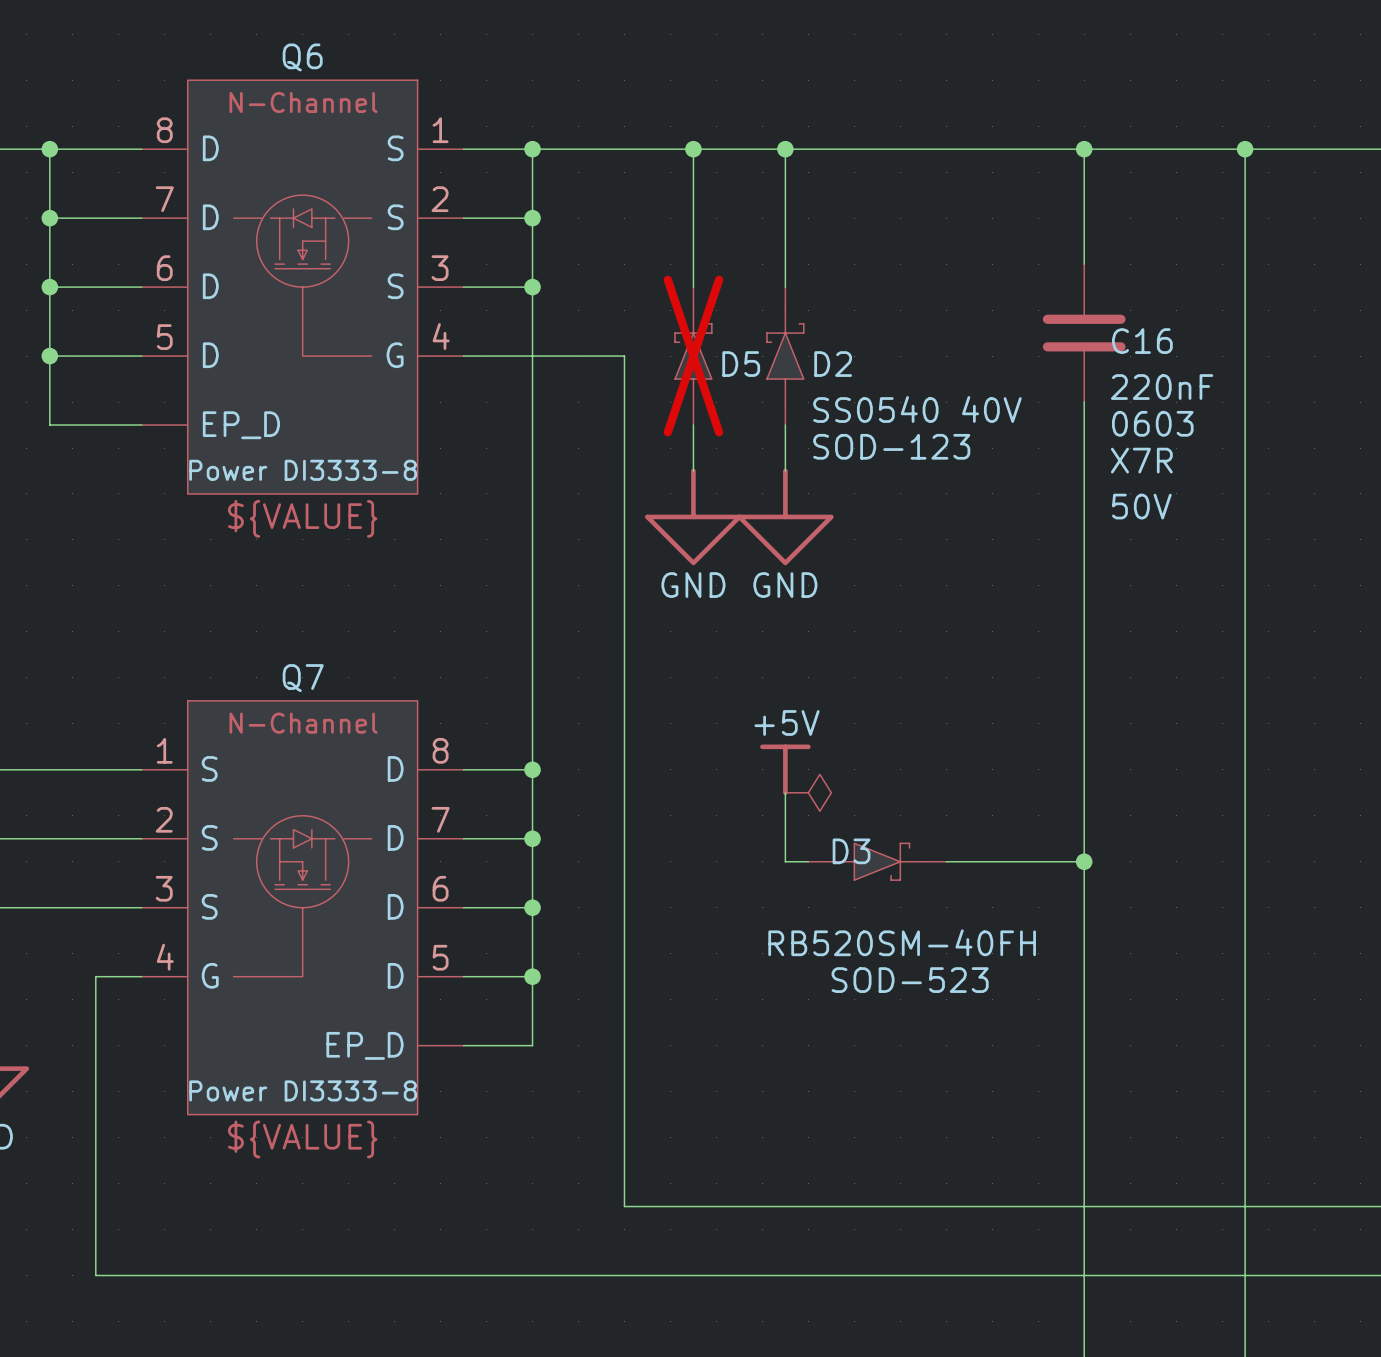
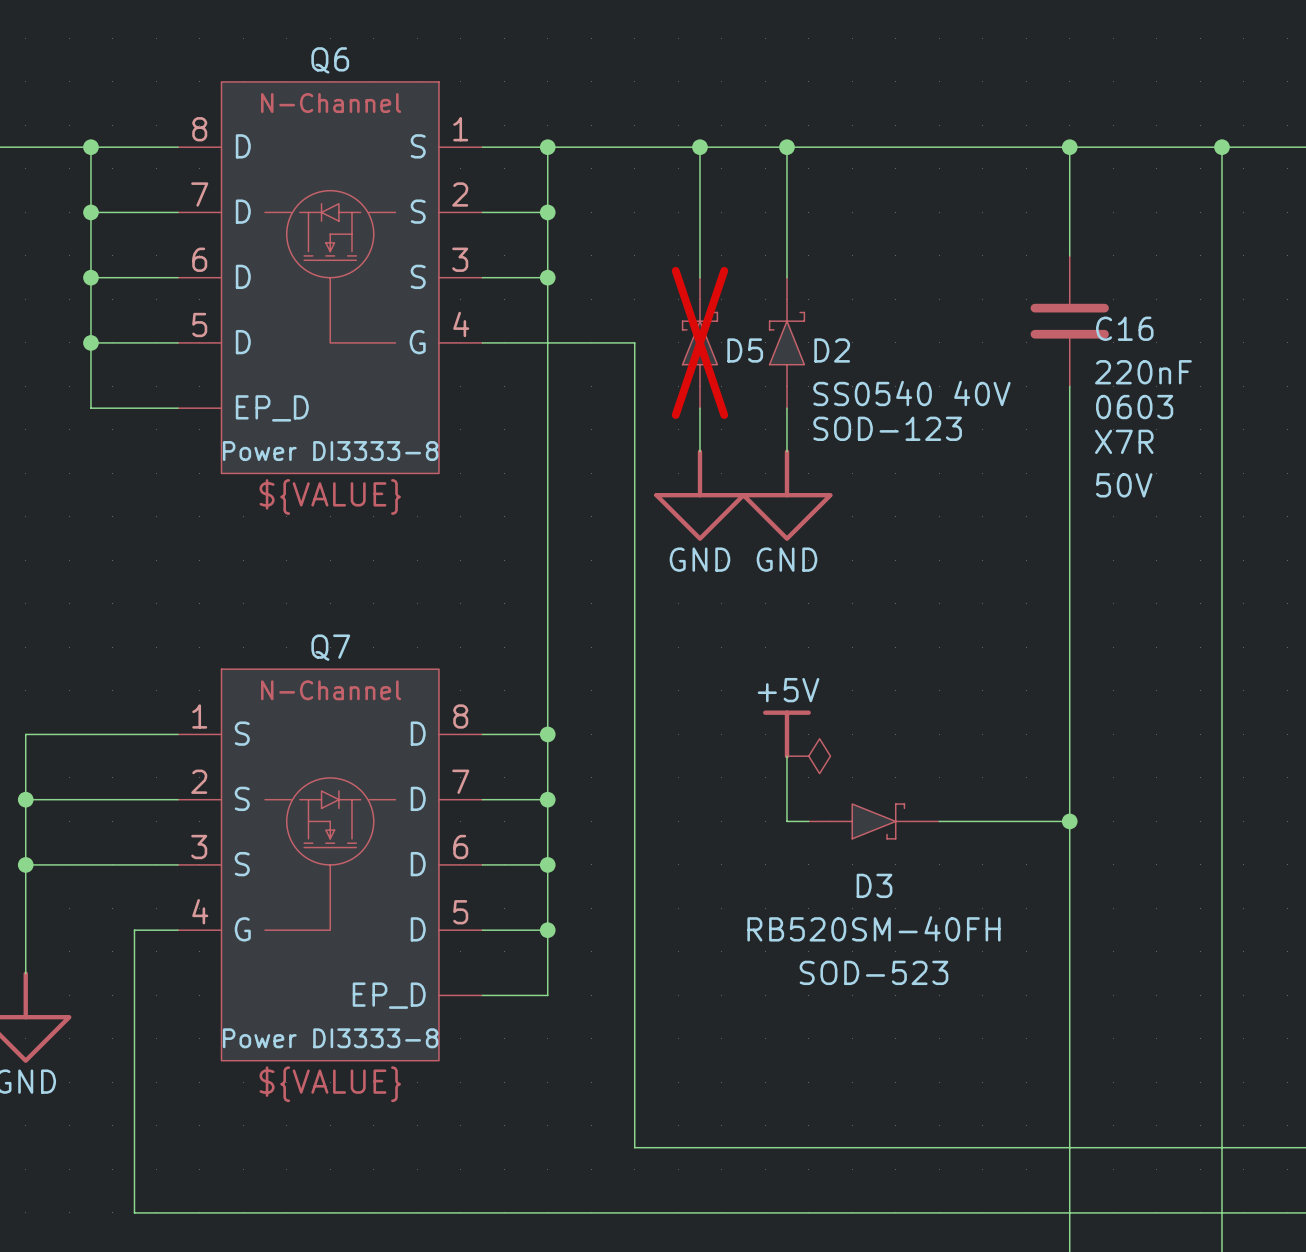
D3 name position: D3 (851, 851) -> D3 (874, 885)
D3 text position: RB520SM-40FH (902, 942) -> RB520SM-40FH (873, 928)
D3 text position: SOD-523 (910, 980) -> SOD-523 (873, 972)

